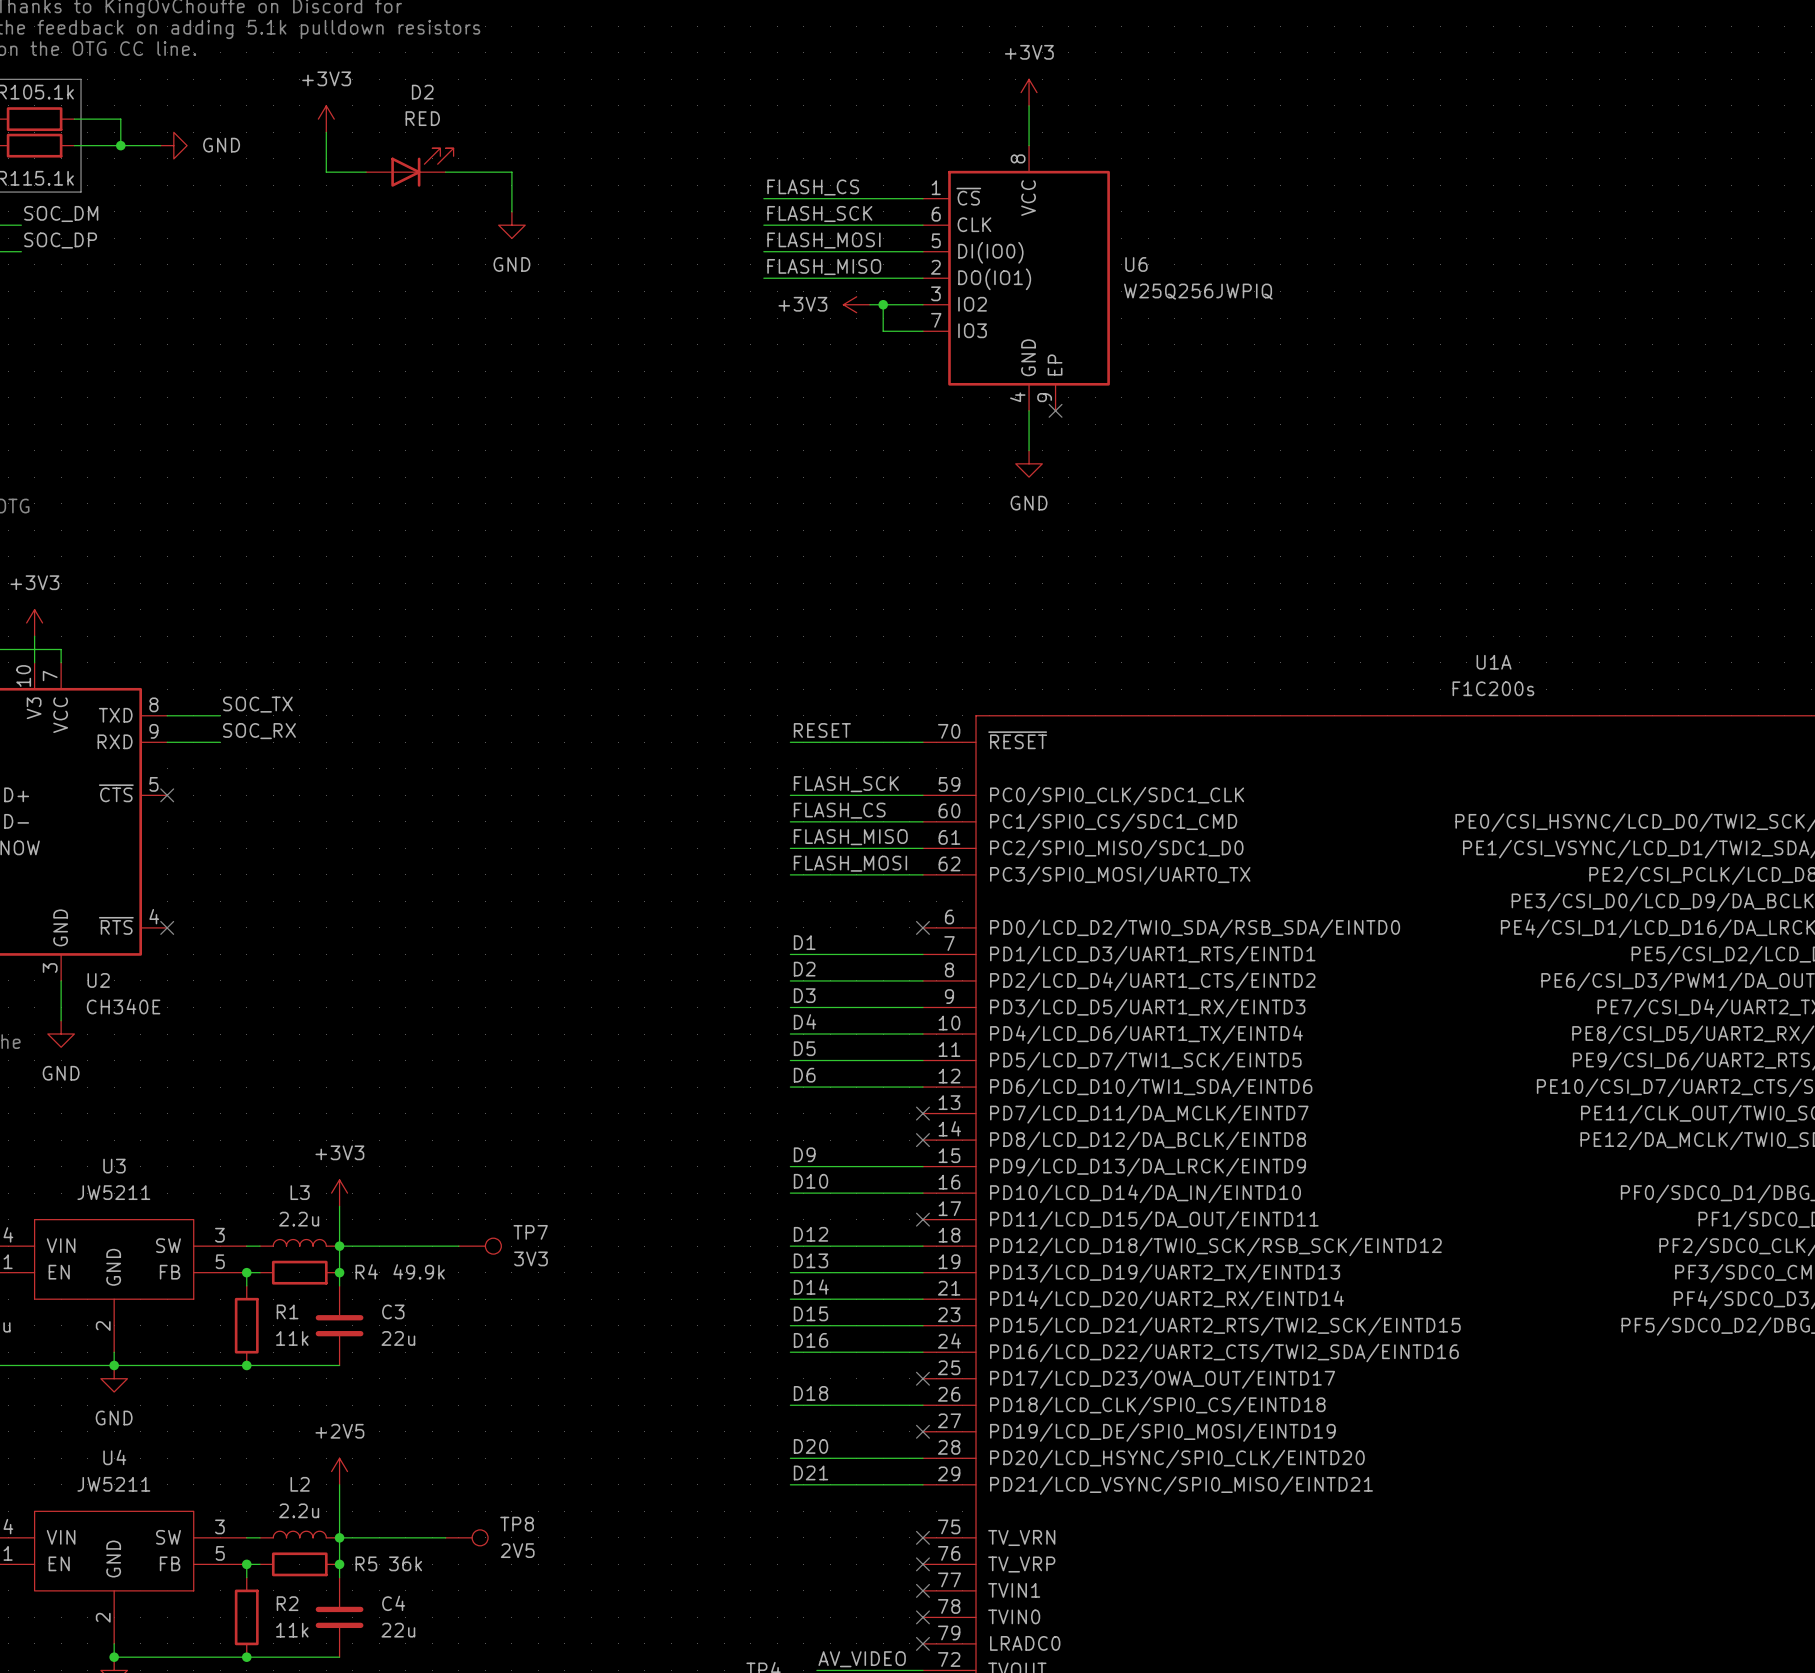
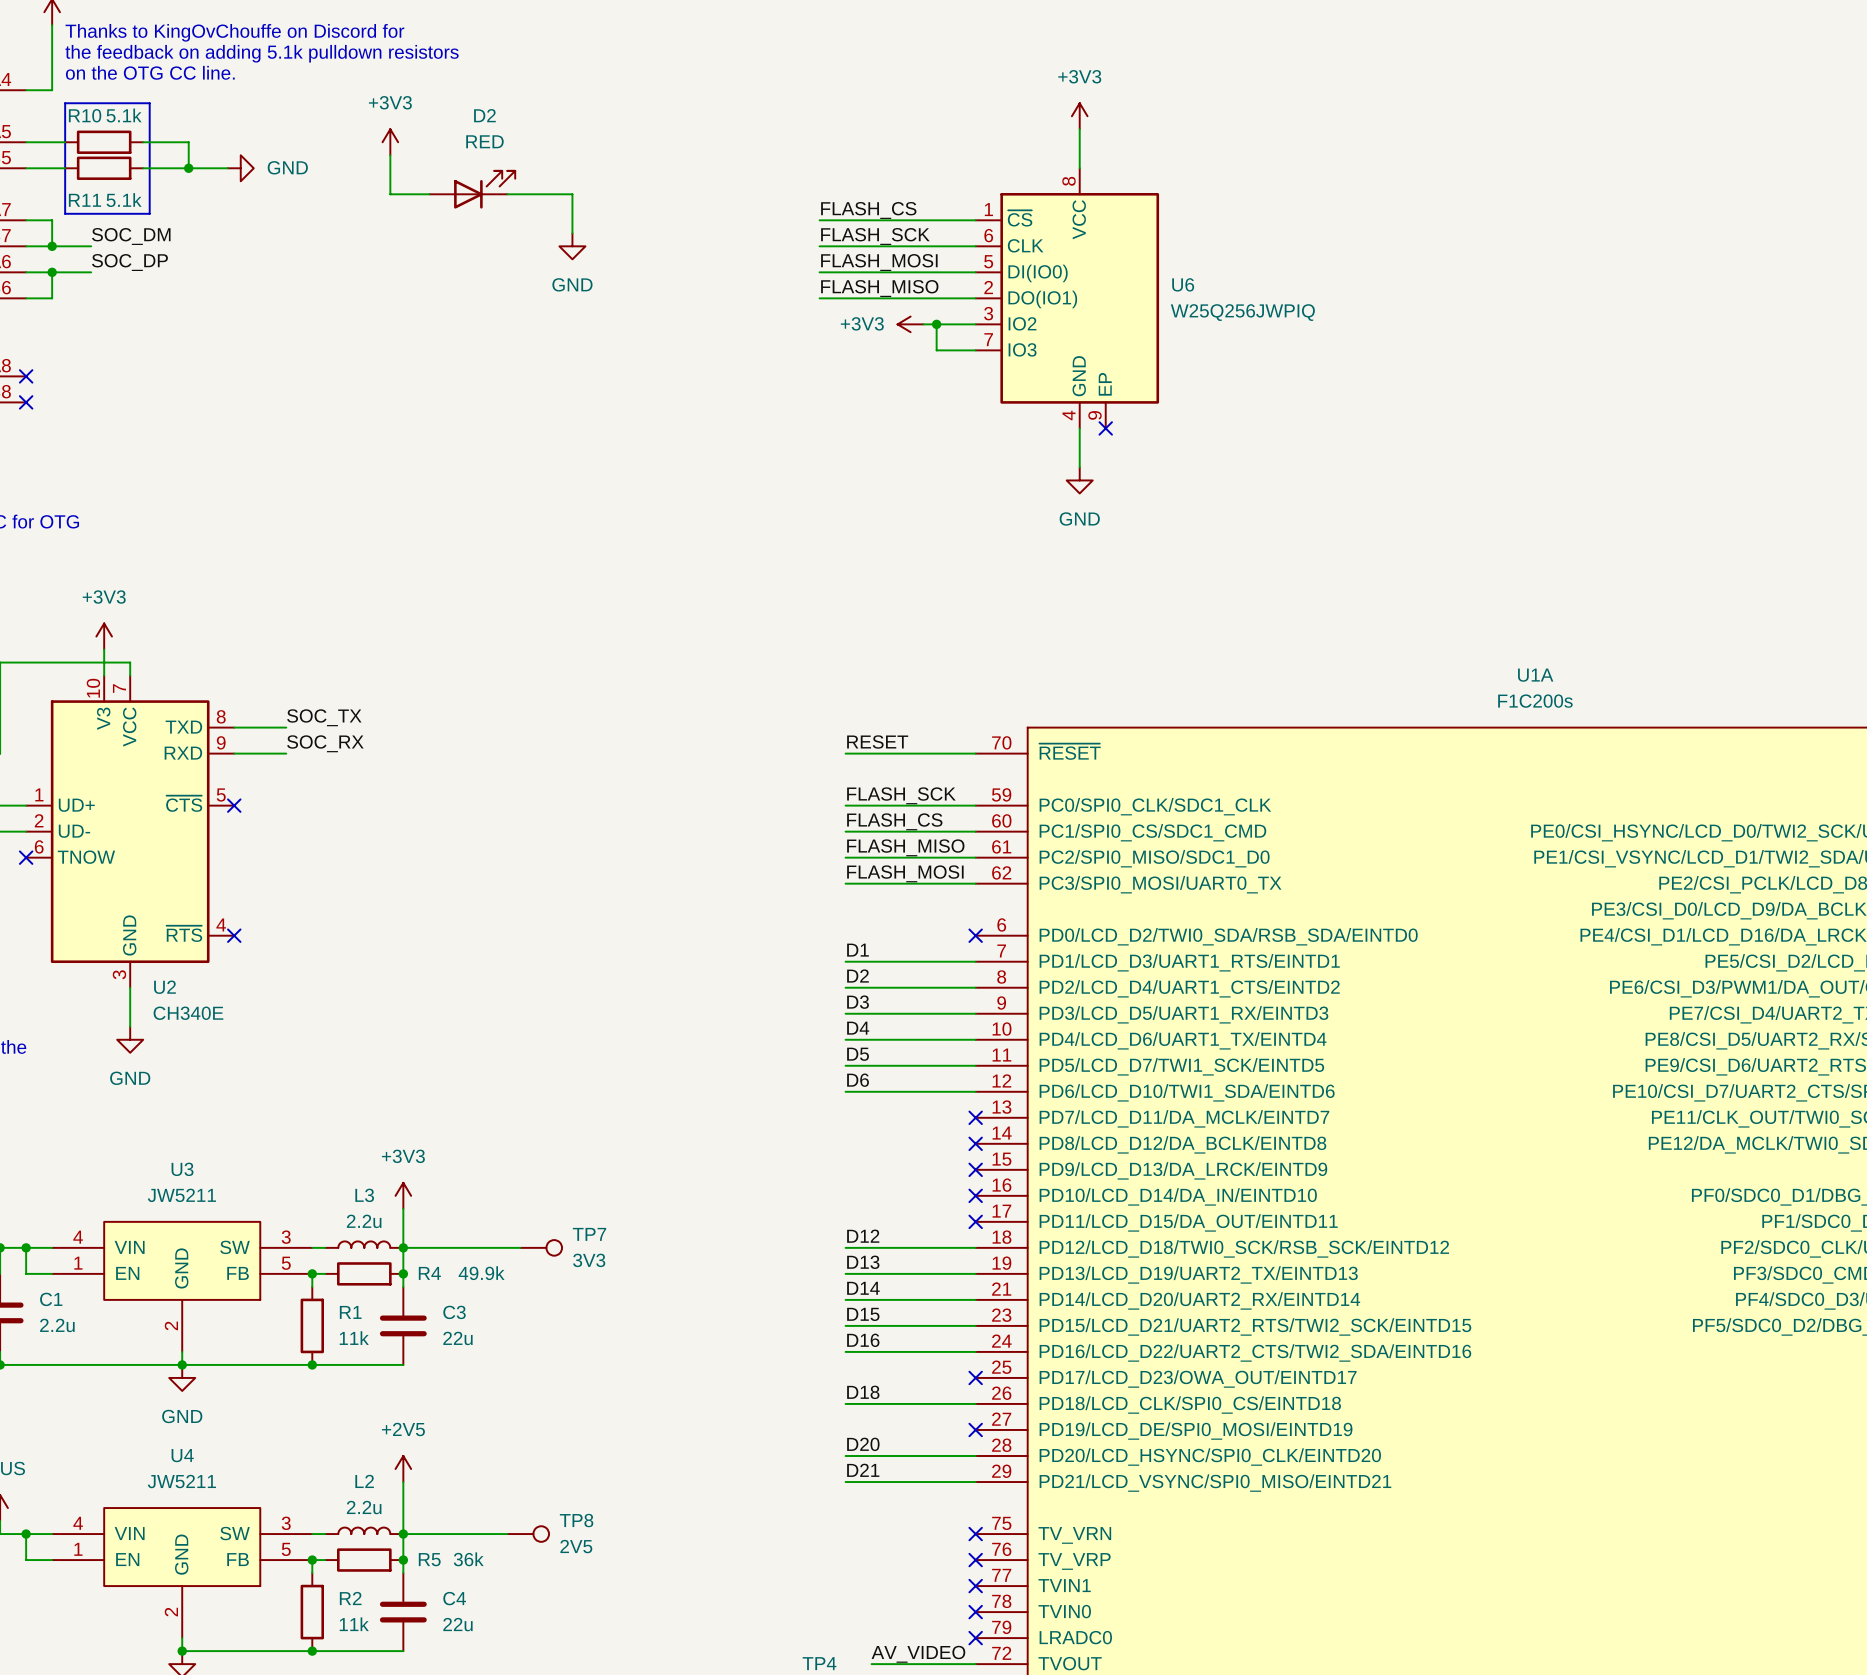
label: D9 (804, 1154) -> none
wire: (790, 1166) (922, 1166) -> none
no-connect mark: none -> (975, 1169)
label: D10 (810, 1181) -> none
wire: (790, 1193) (922, 1193) -> none
no-connect mark: none -> (975, 1195)

